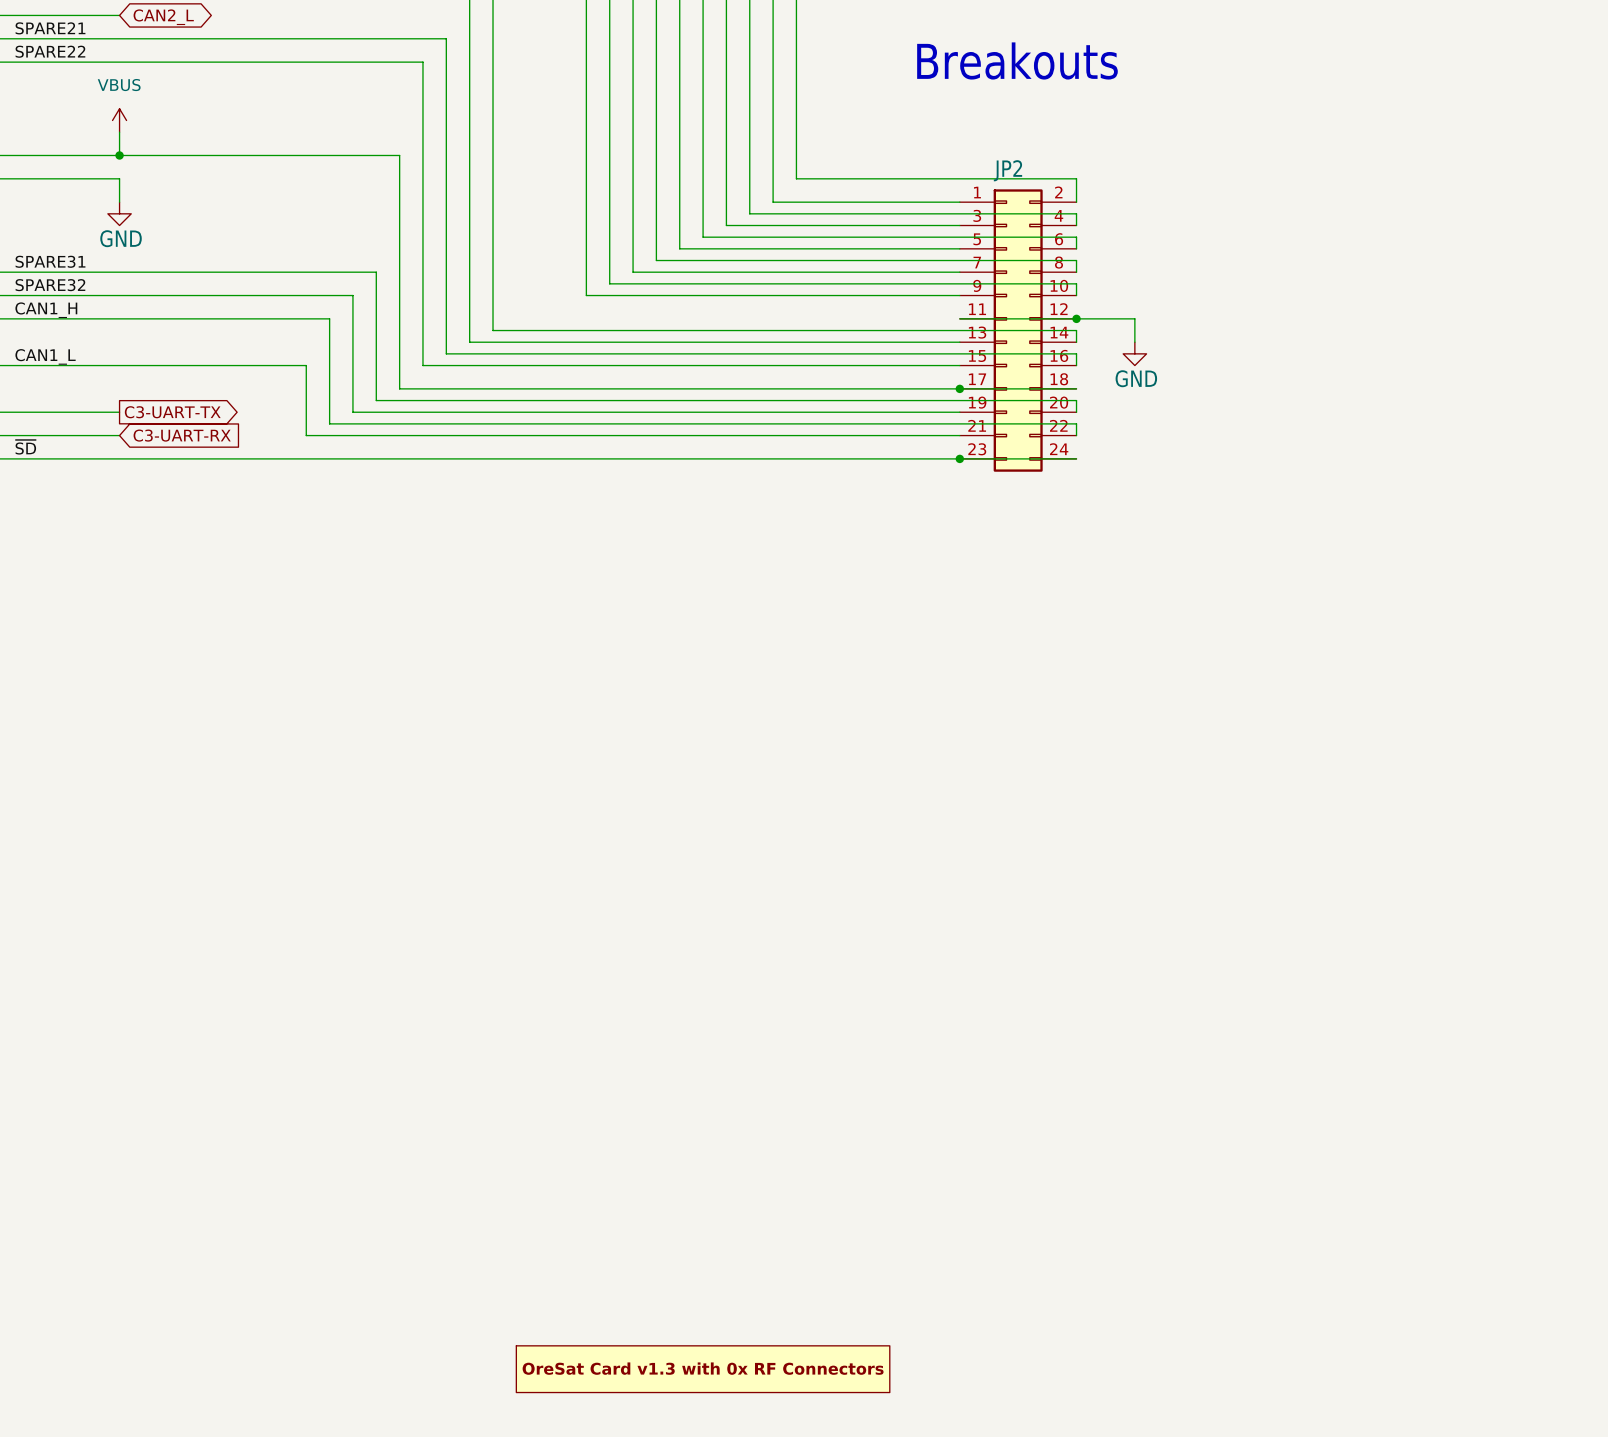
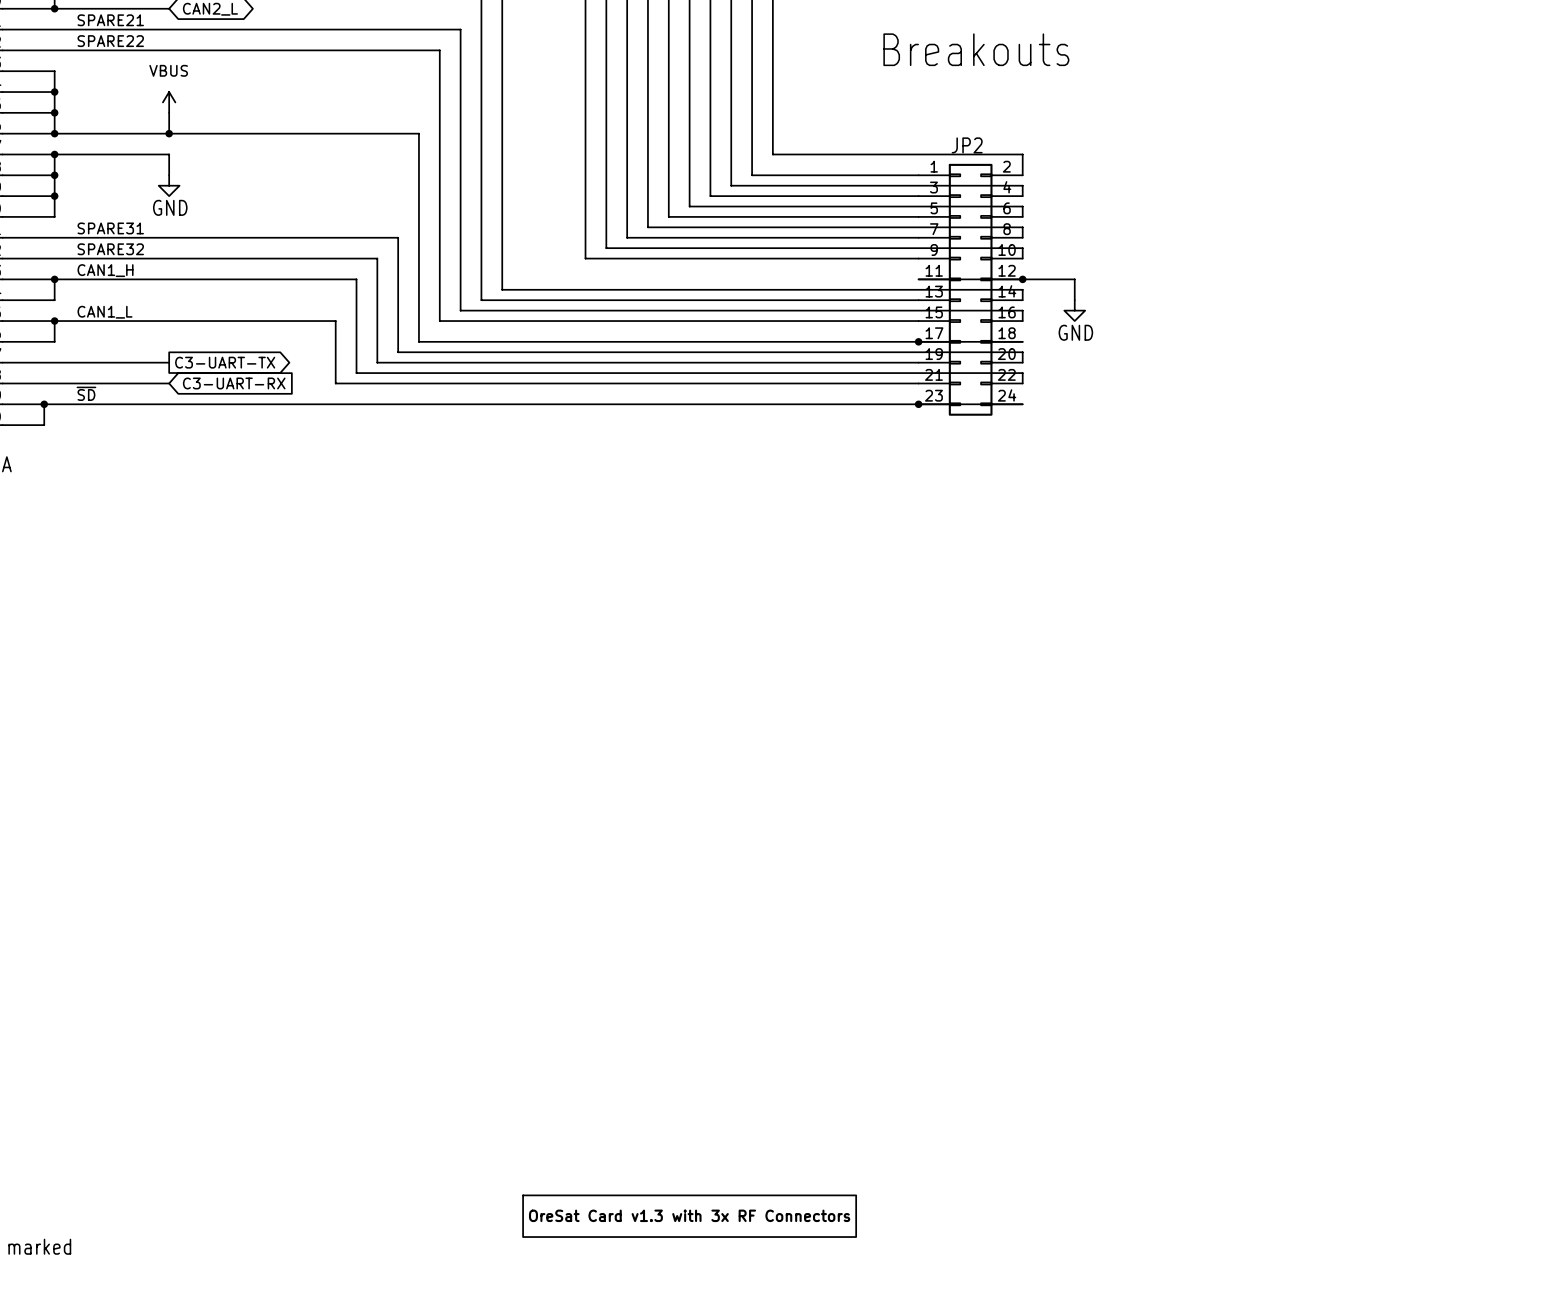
part text: OreSat Card v1.3 with 0x RF Connectors (703, 1368) -> OreSat Card v1.3 with 3x RF Connectors (689, 1215)

